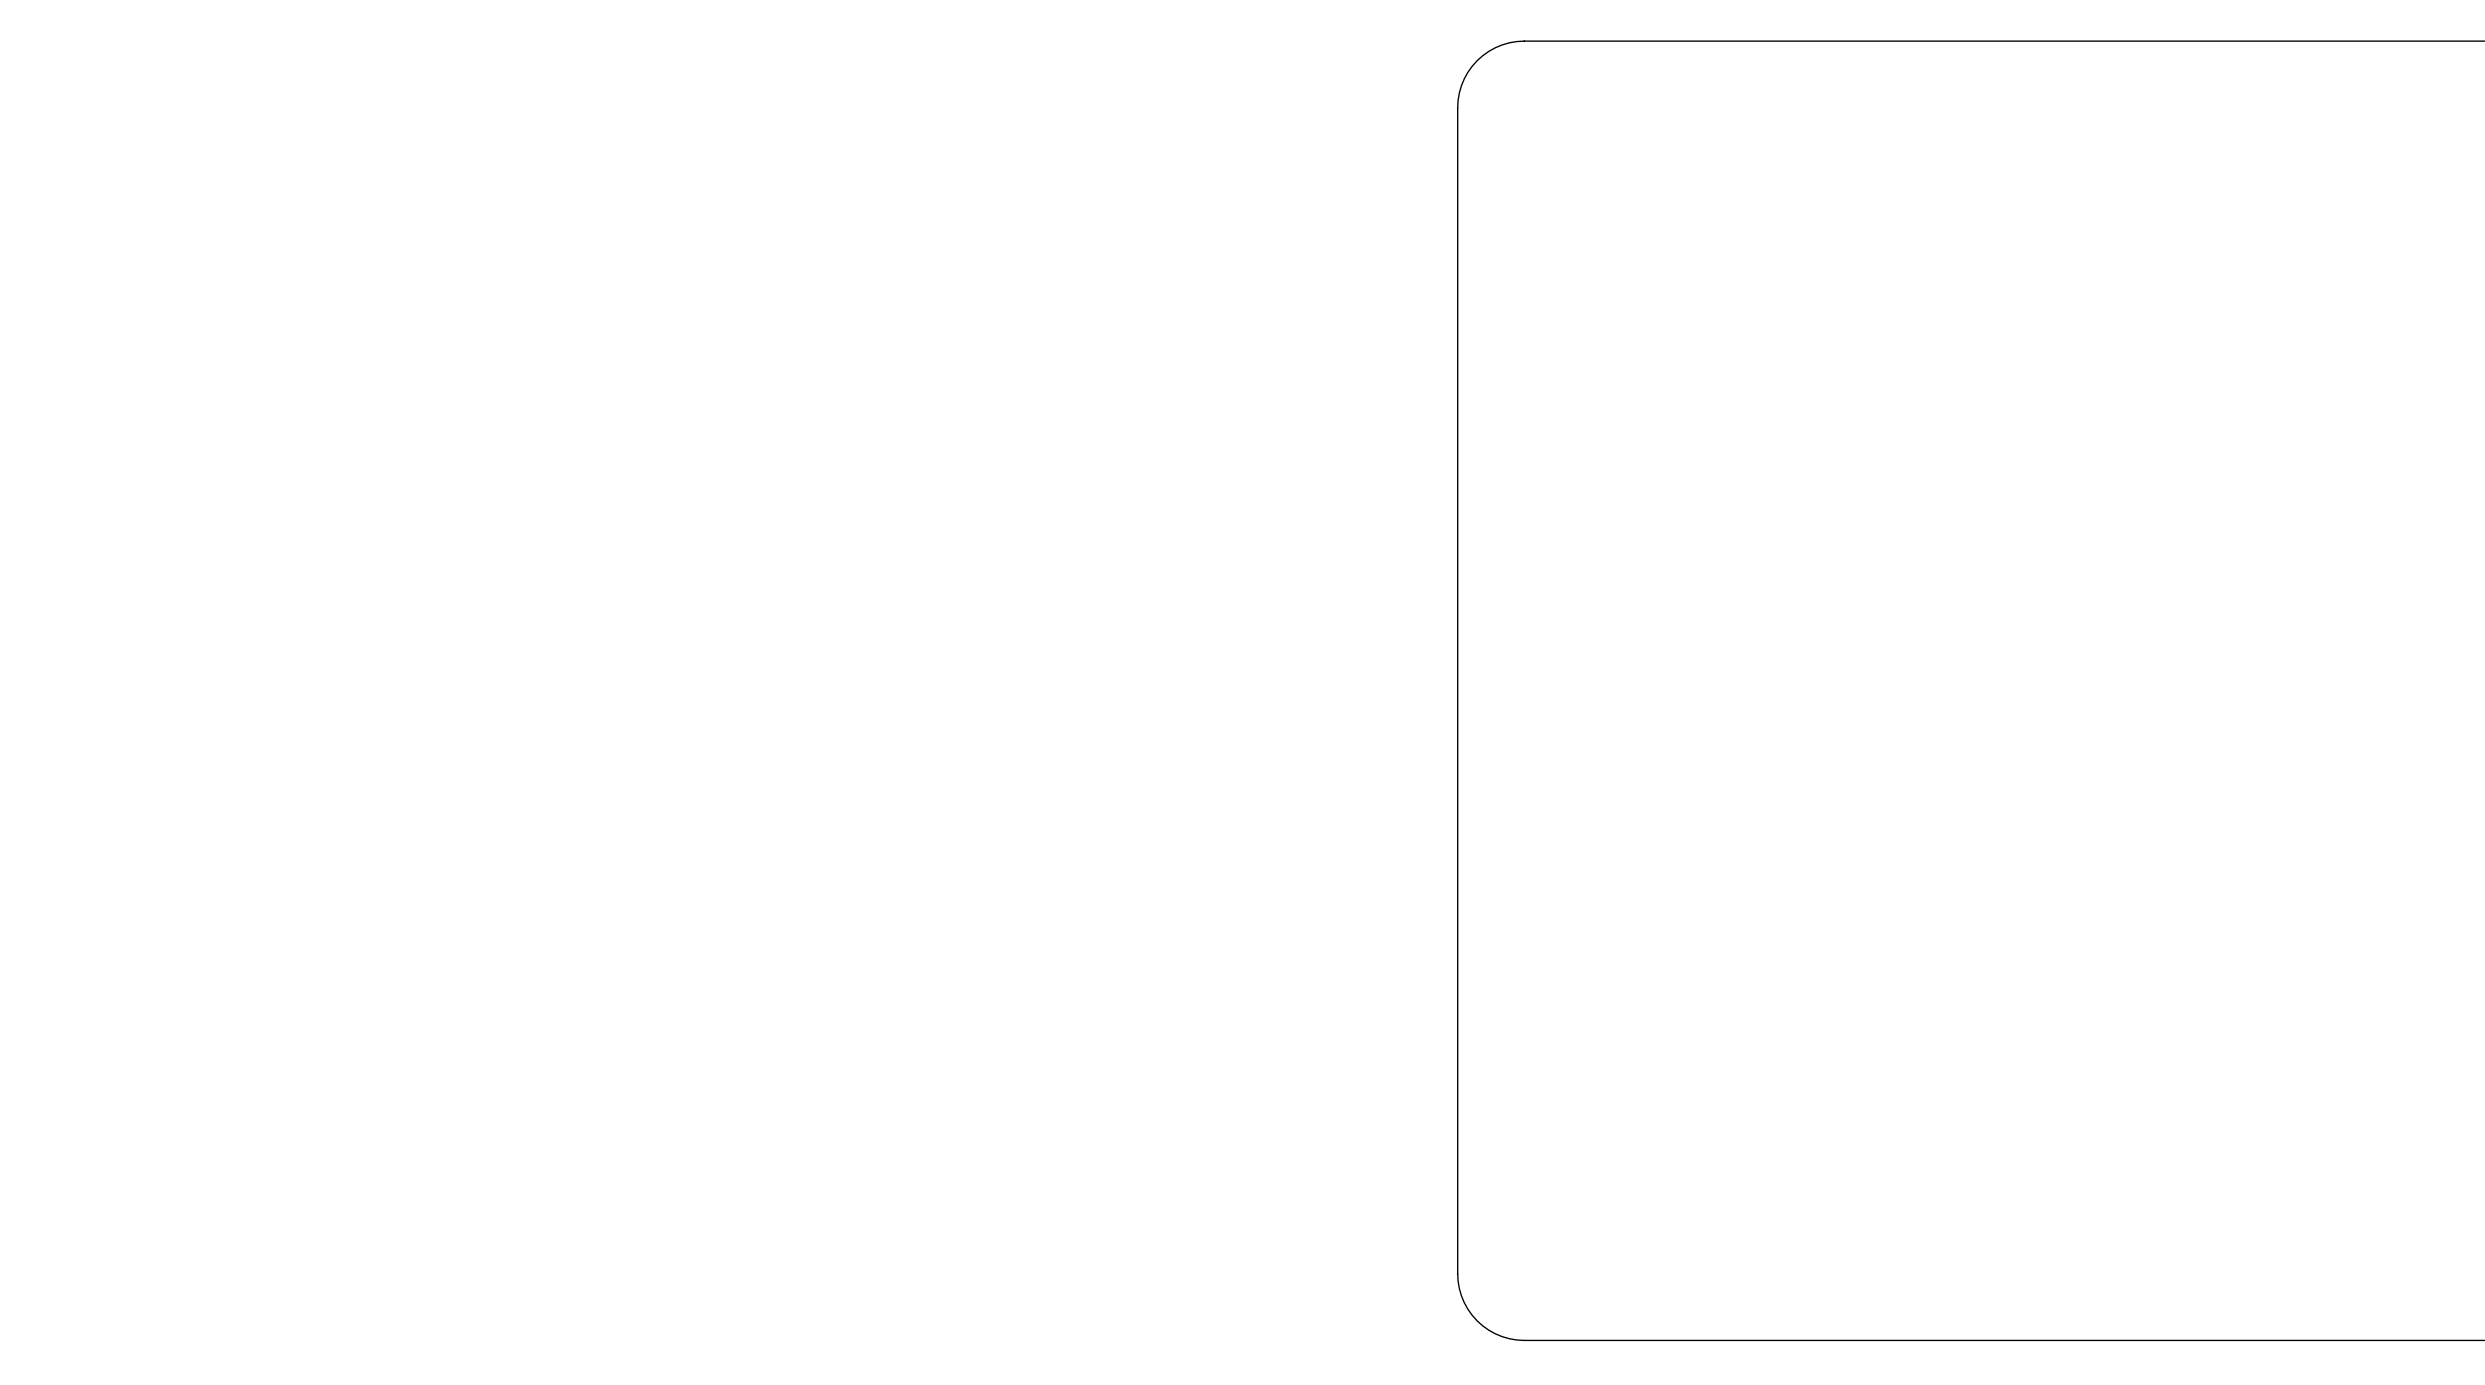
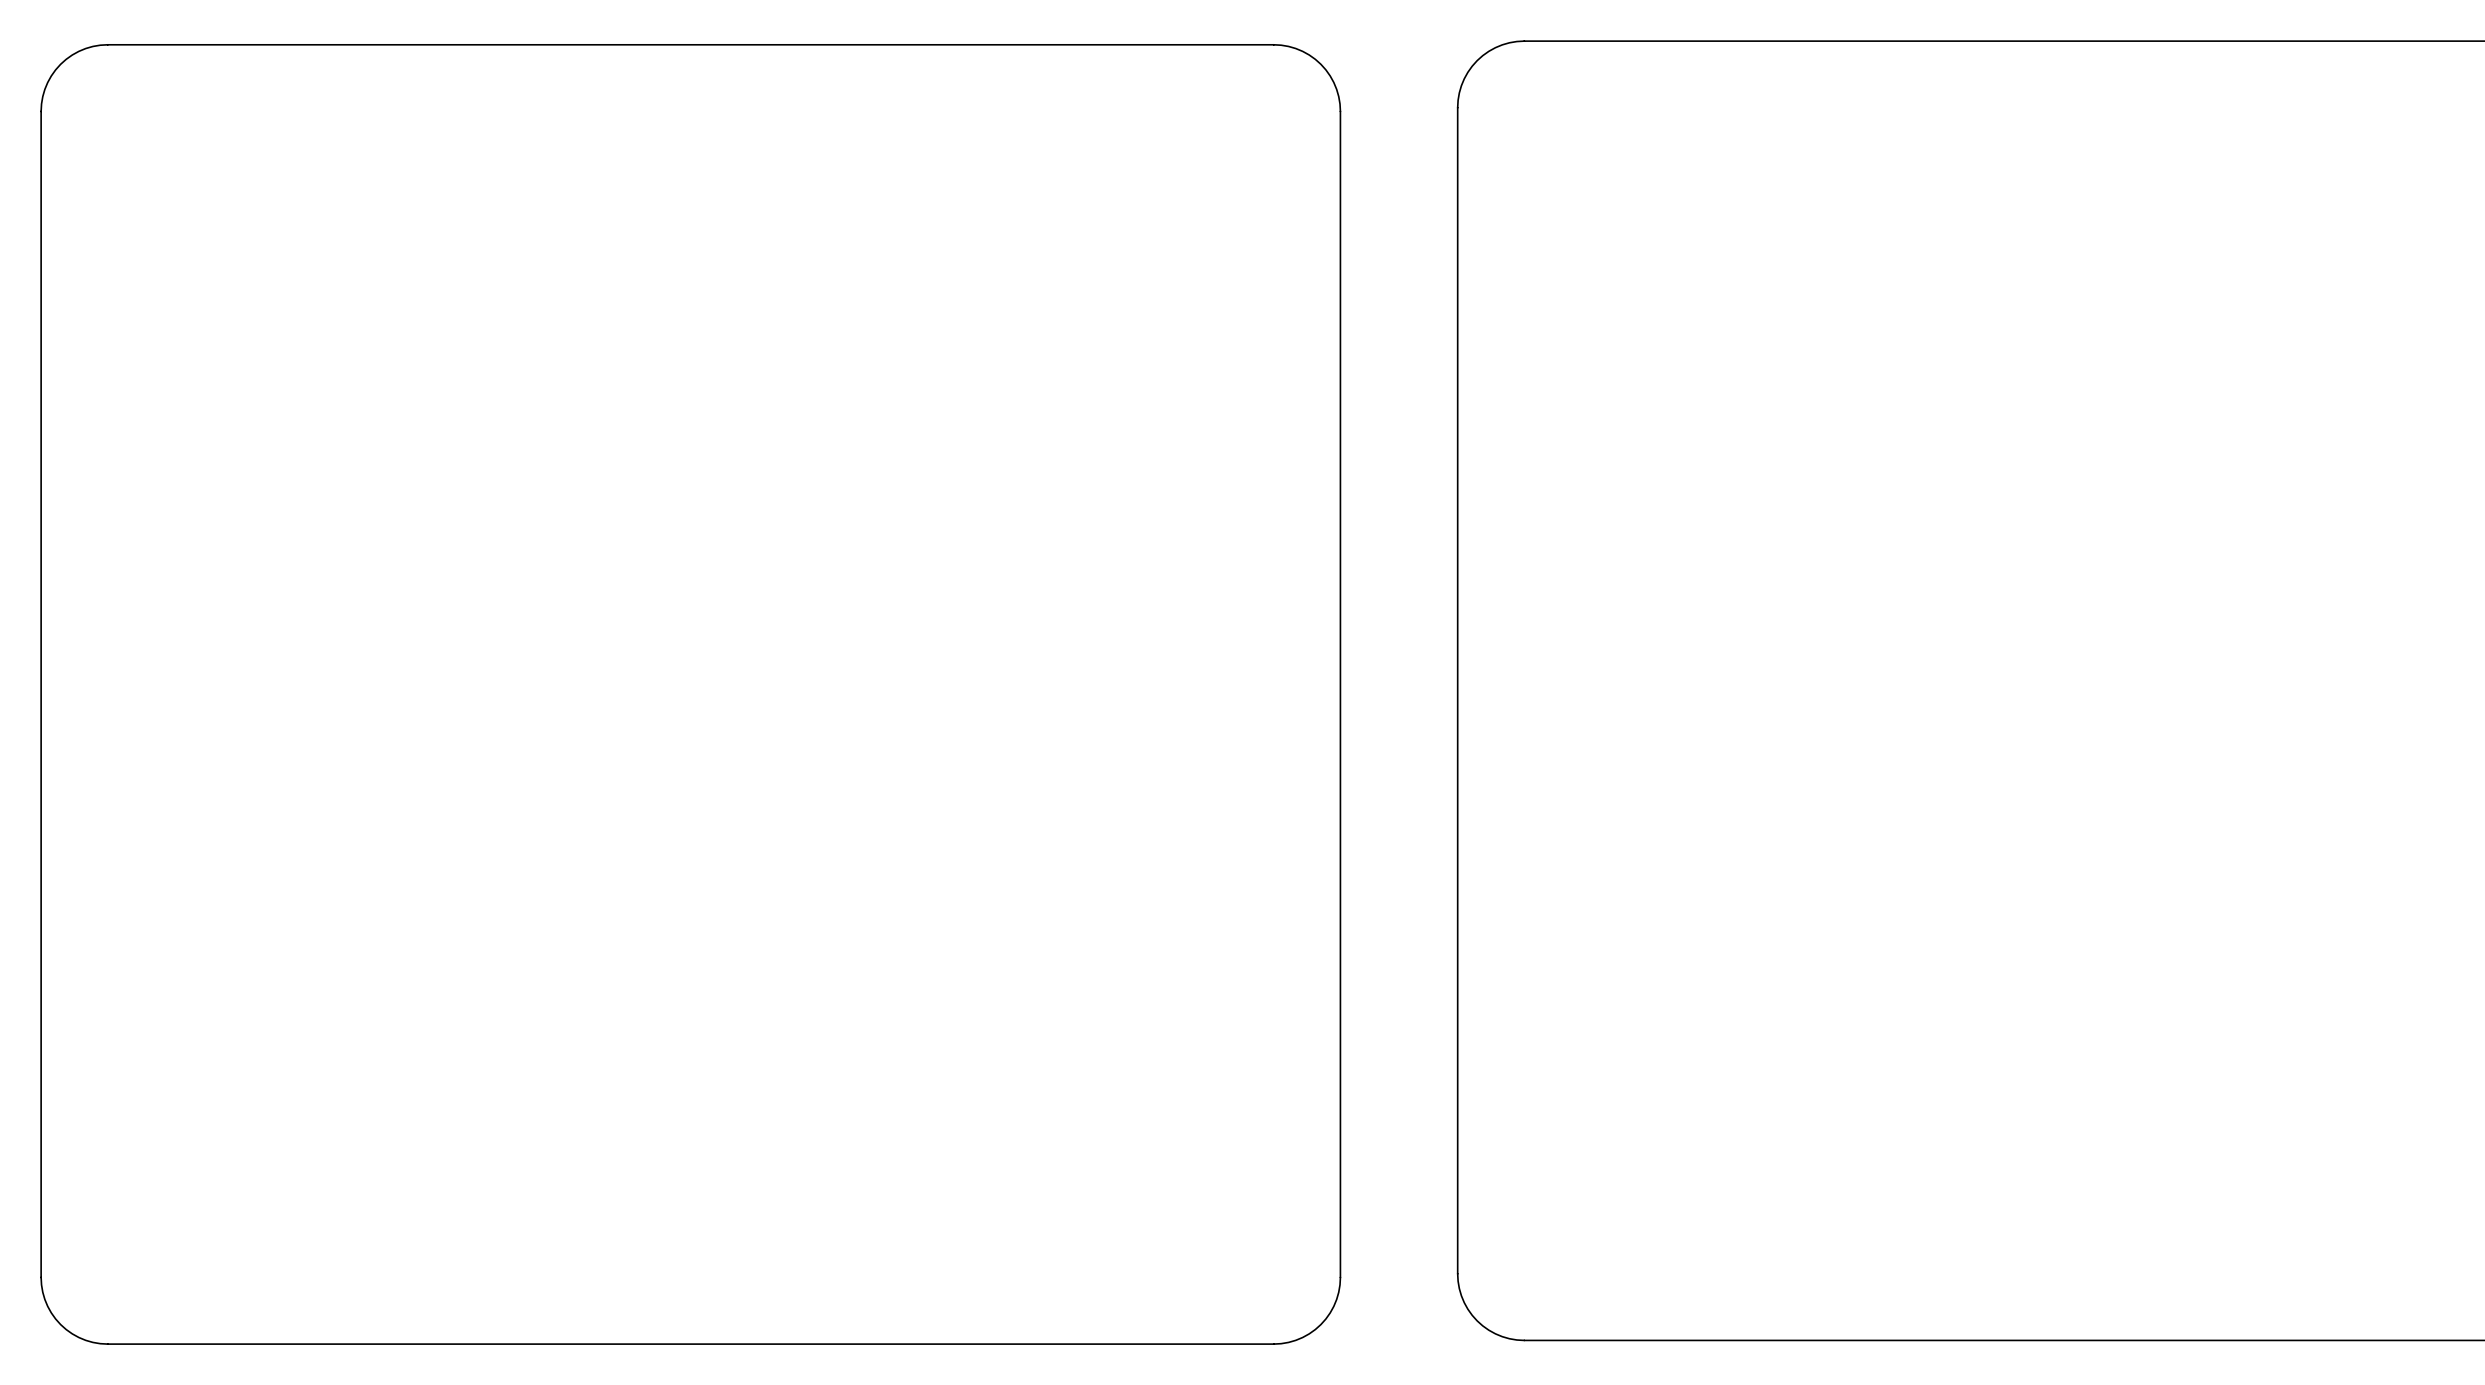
board edge: none -> (1273, 44) (107, 44) (85, 48) (72, 55) (60, 64) (47, 82) (42, 96) (41, 111) (41, 1277) (42, 1292) (47, 1306) (60, 1324) (78, 1337) (92, 1342) (107, 1344) (1273, 1344) (1288, 1342) (1302, 1337) (1320, 1324) (1333, 1306) (1338, 1292) (1340, 1277) (1340, 111) (1338, 96) (1333, 82) (1320, 64) (1302, 51) (1288, 46) (1273, 44)

